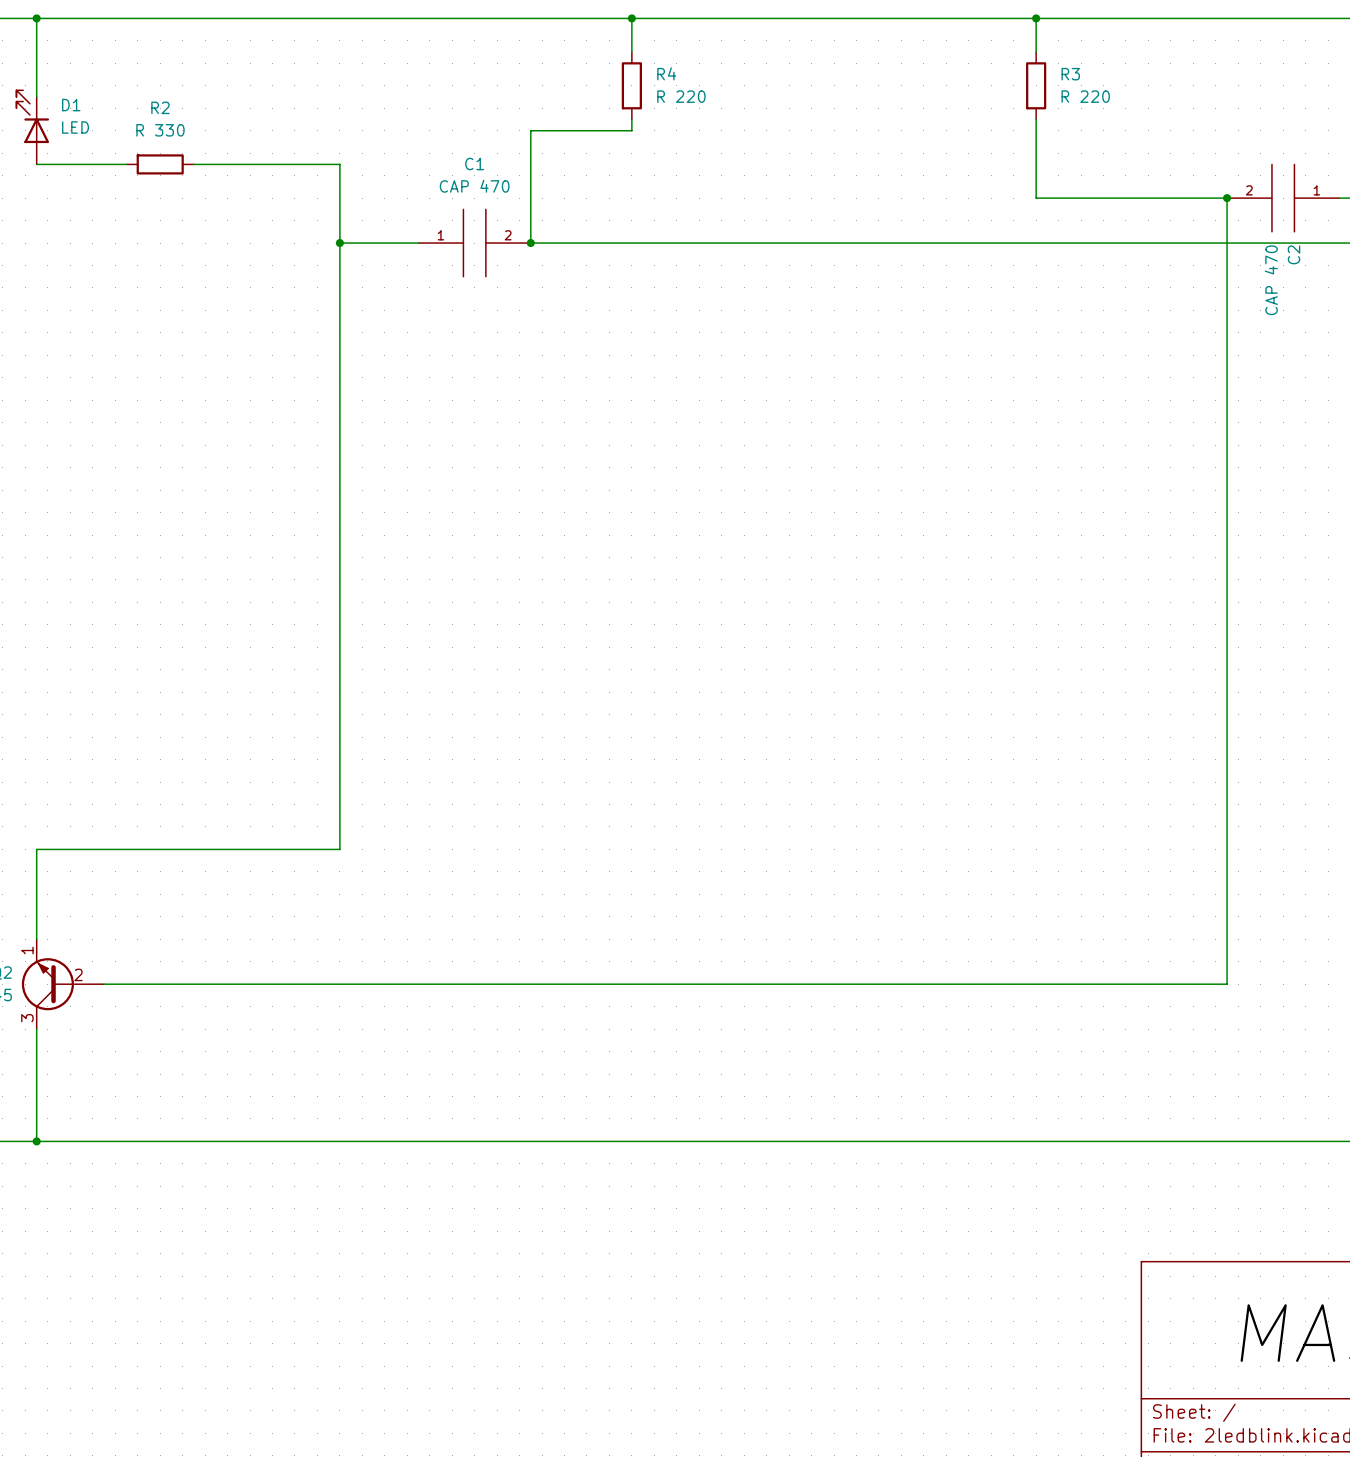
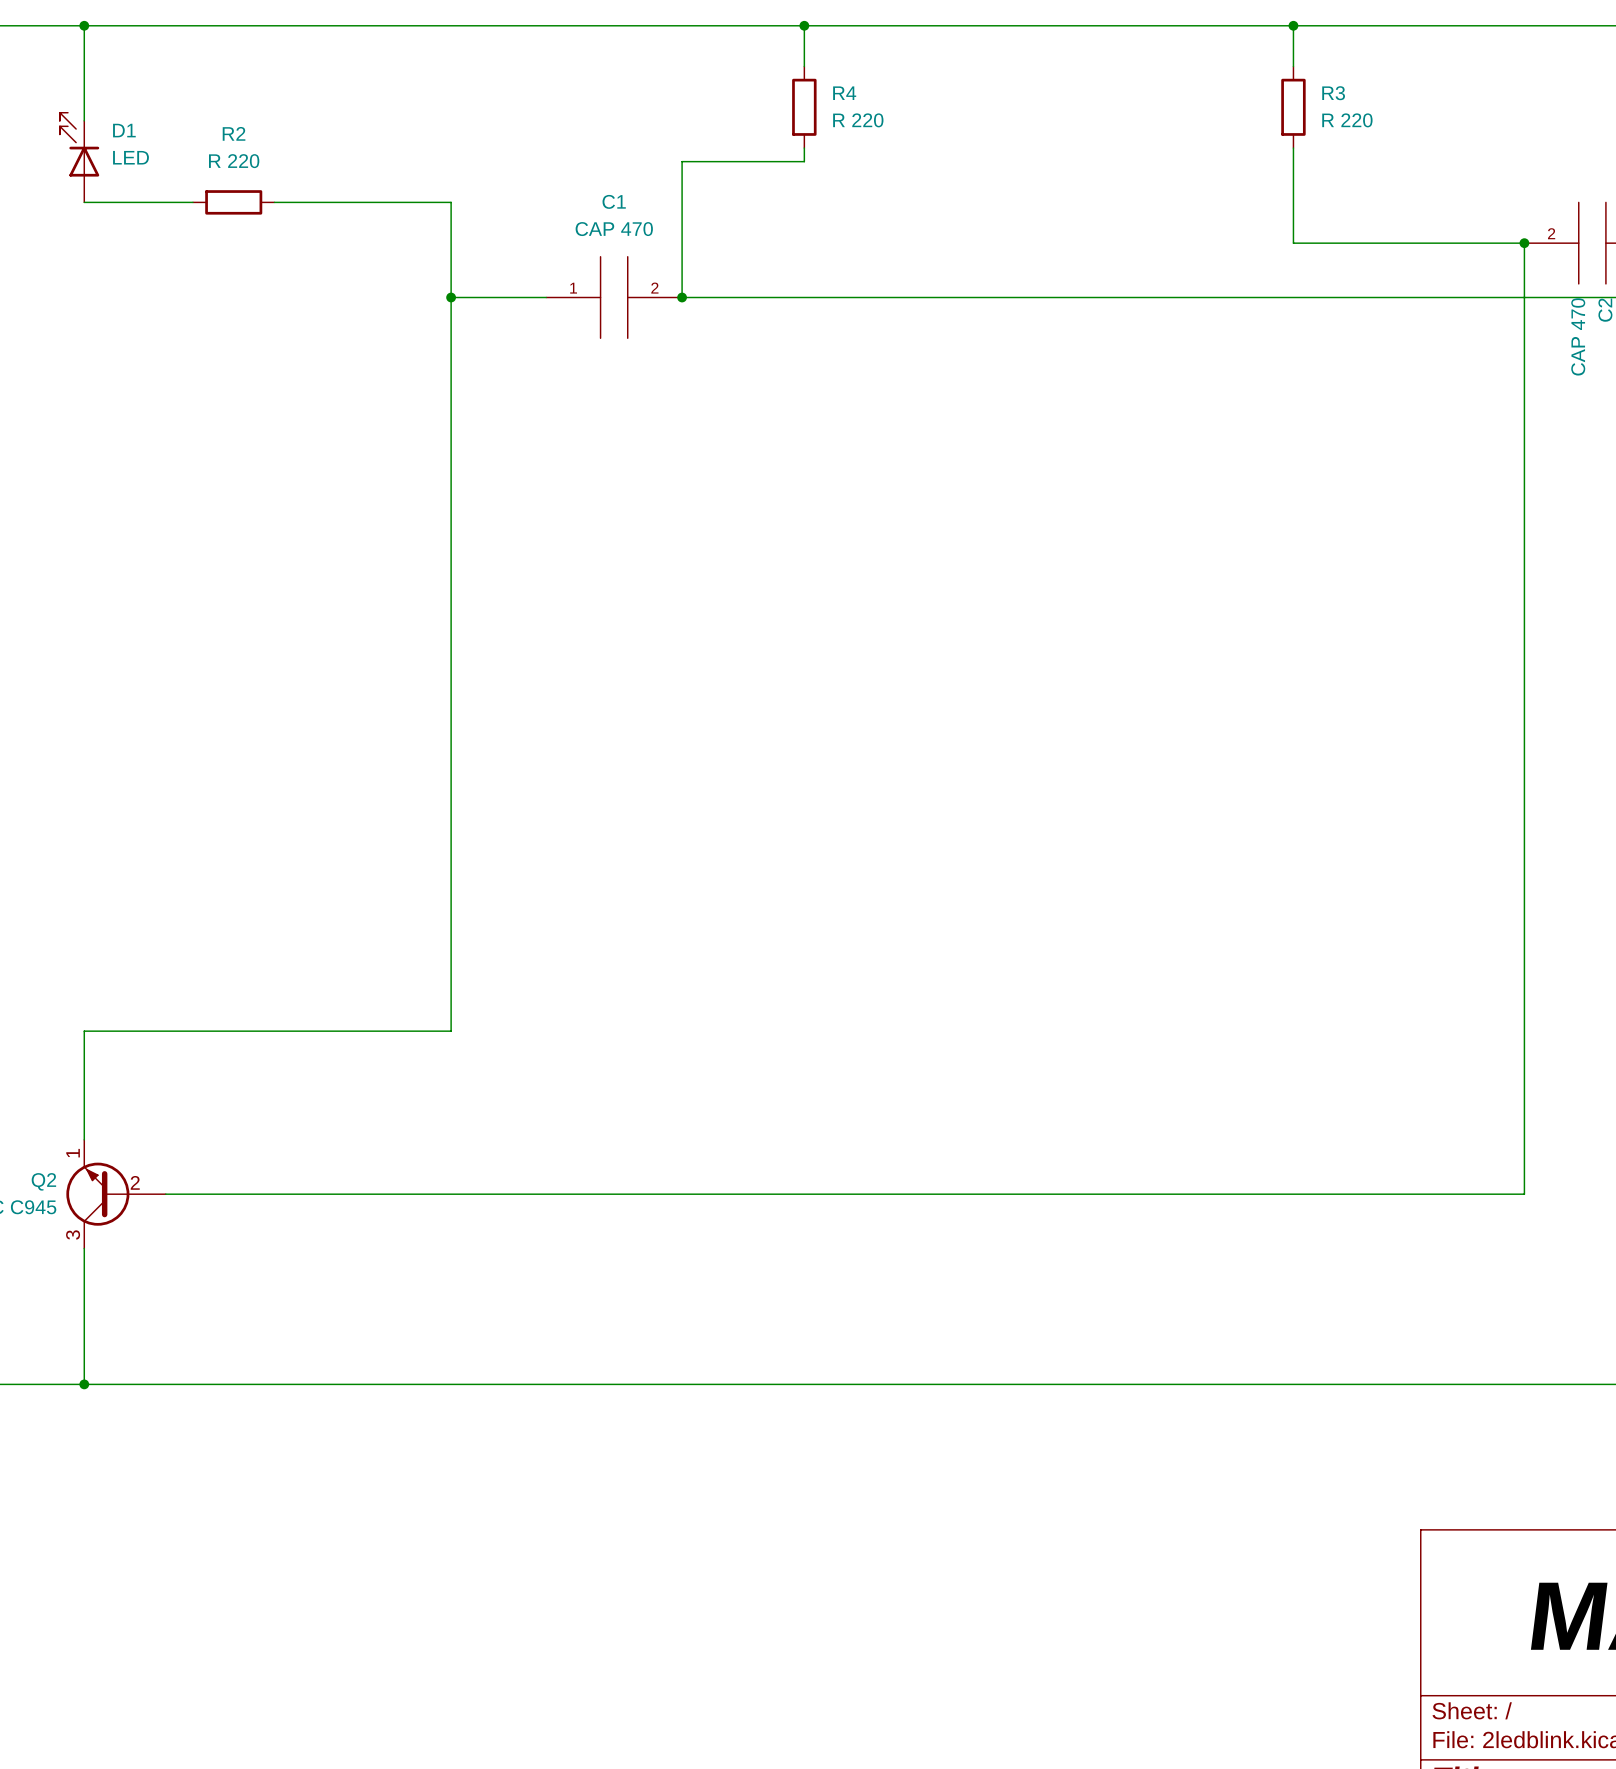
R2 value: R 330 (160, 130) -> R 220 (234, 161)

